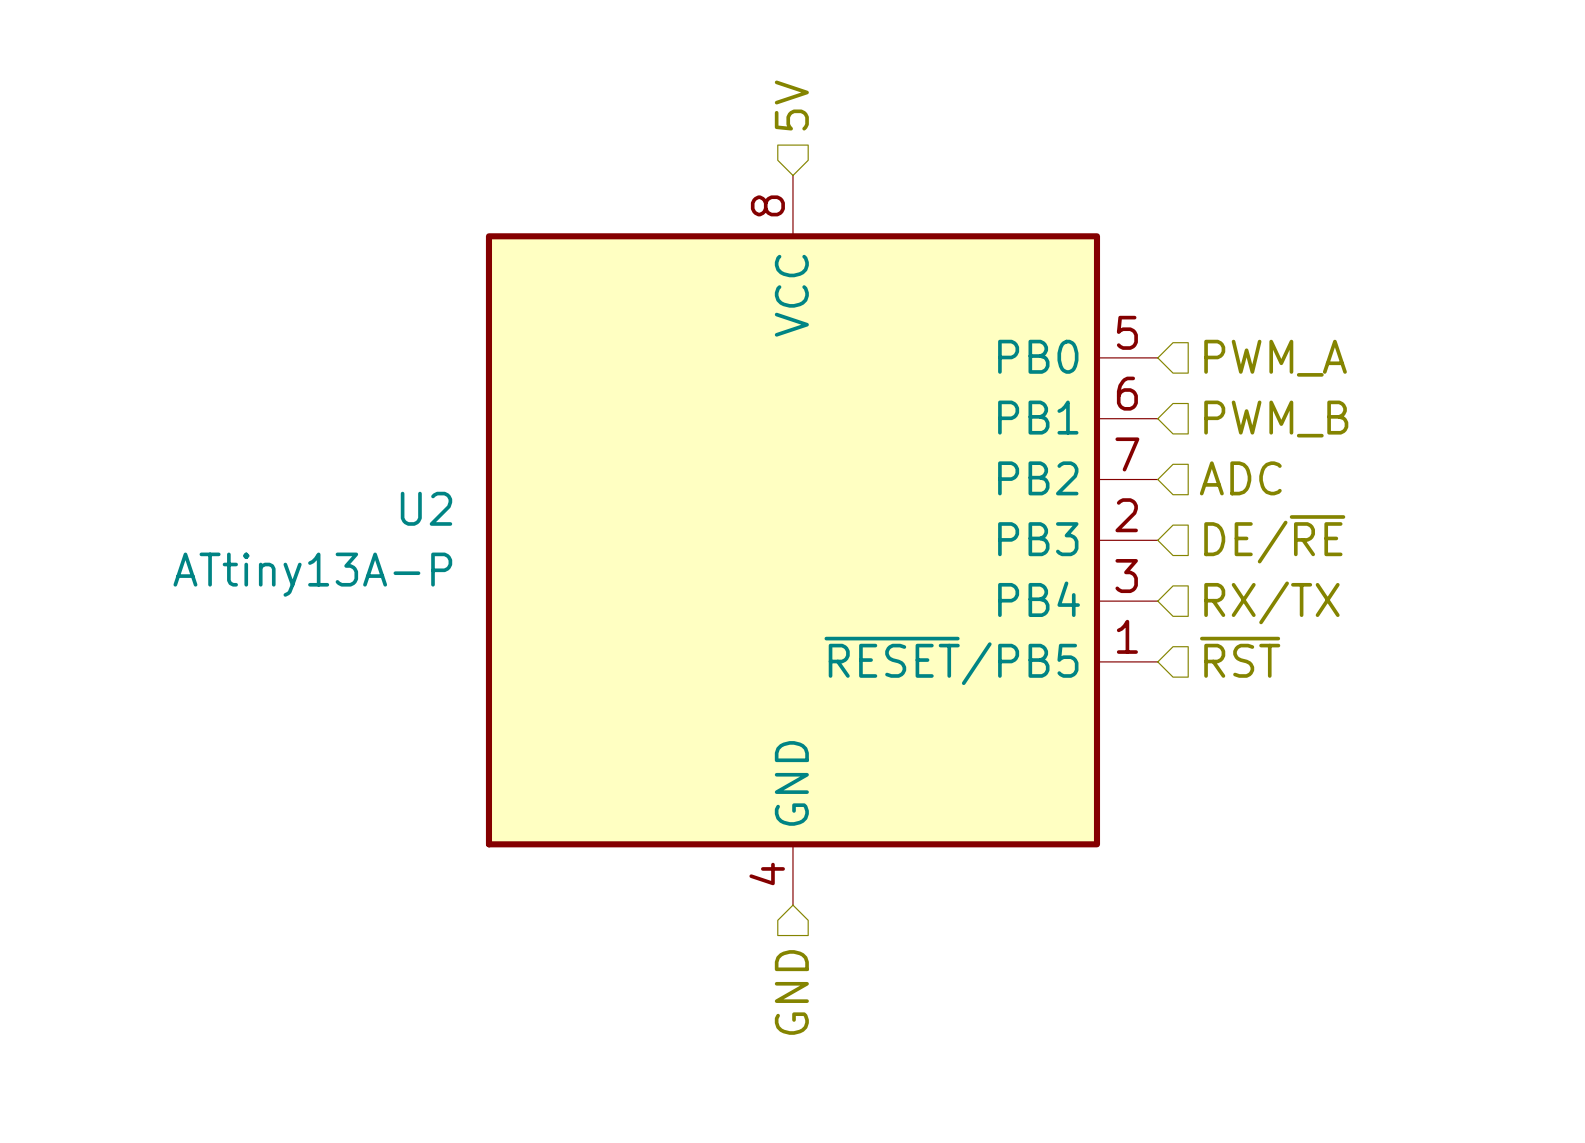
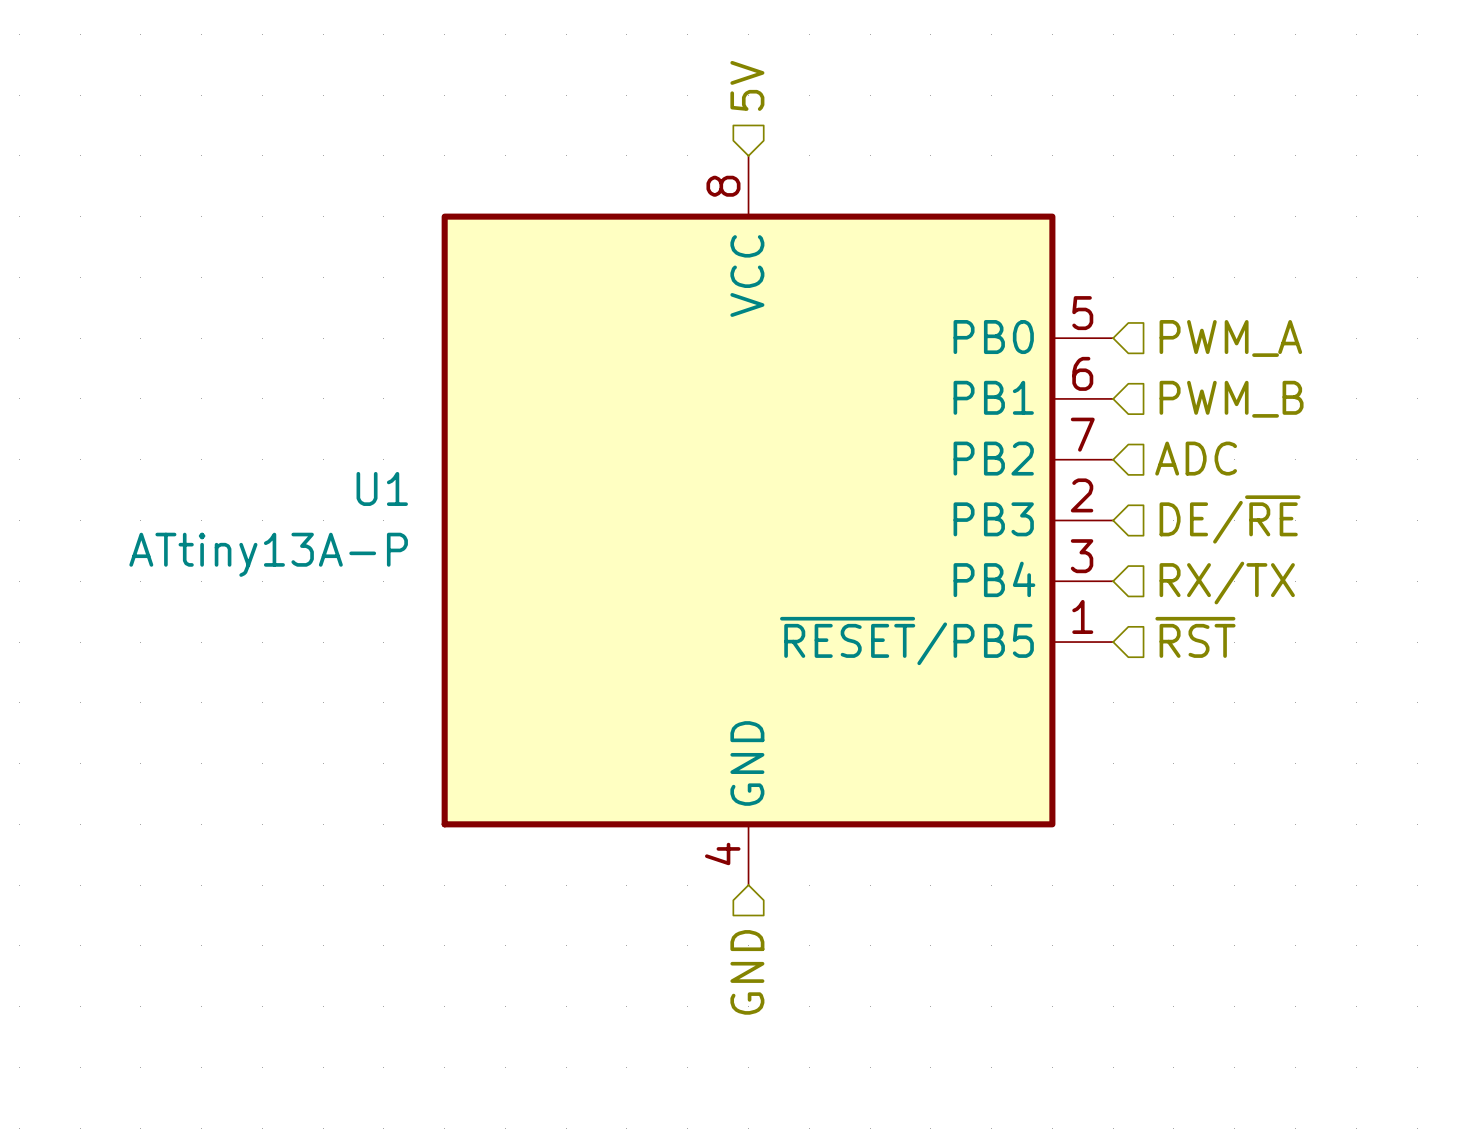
U2 name: U2 (426, 508) -> U1 (382, 488)

